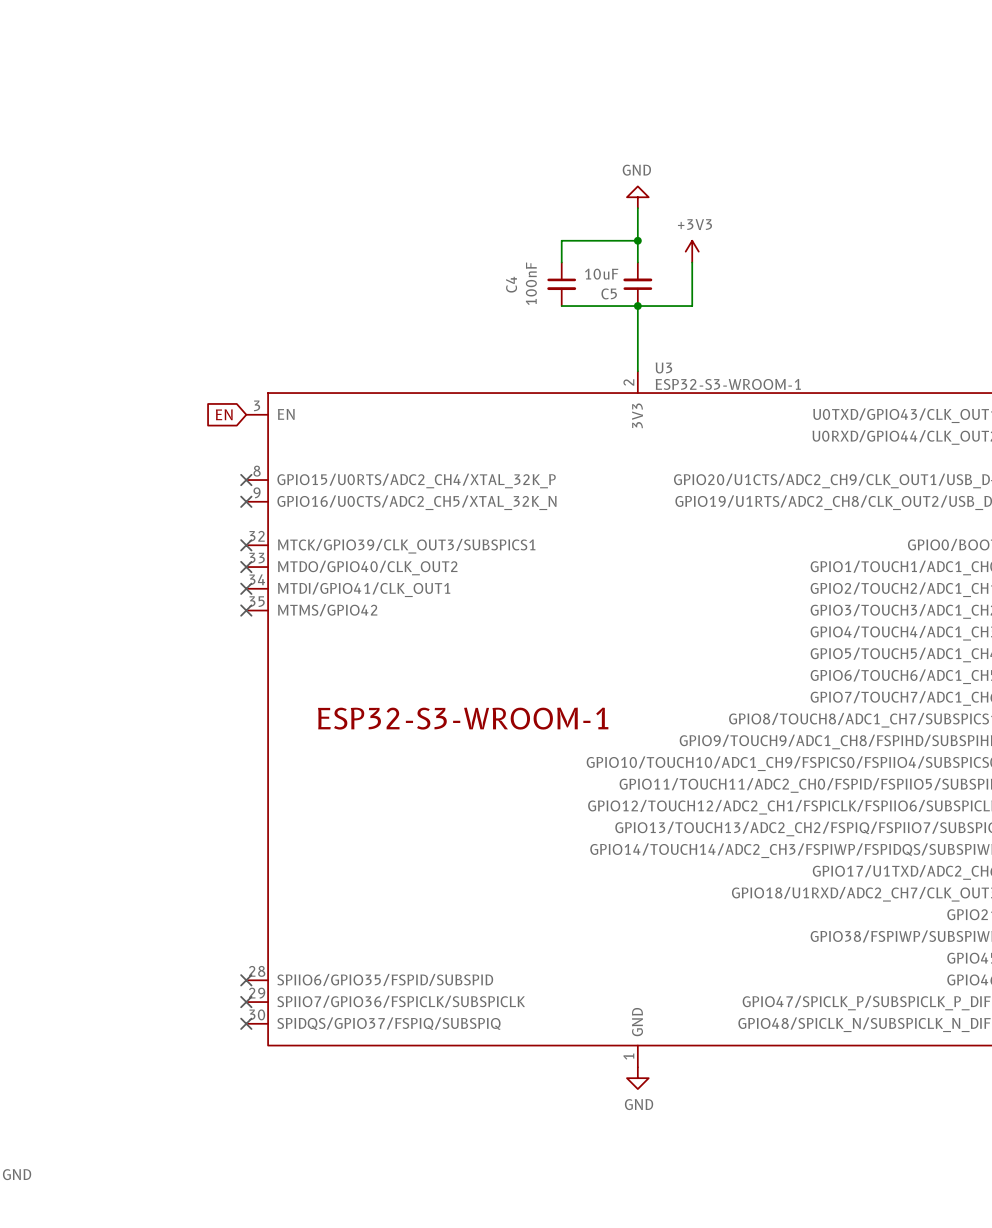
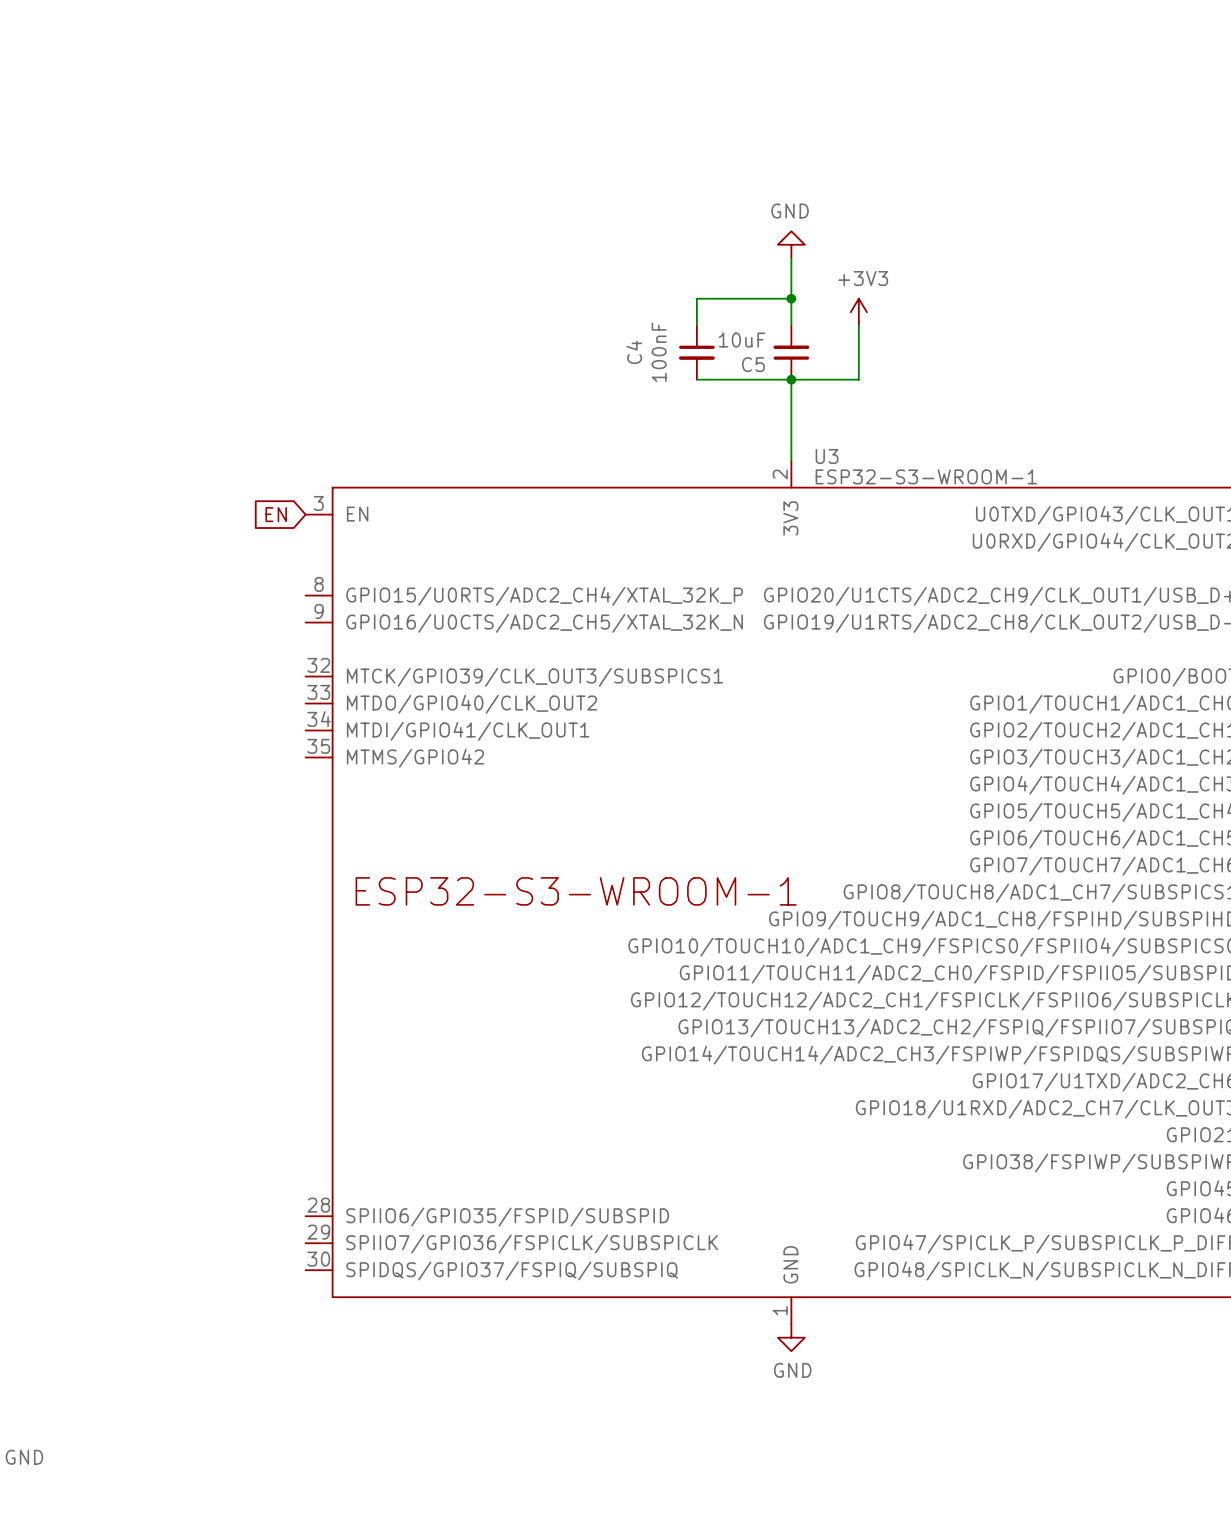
no-connect mark: (246, 480) -> none
no-connect mark: (246, 501) -> none
no-connect mark: (246, 545) -> none
no-connect mark: (246, 567) -> none
no-connect mark: (246, 588) -> none
no-connect mark: (246, 610) -> none
no-connect mark: (246, 980) -> none
no-connect mark: (246, 1002) -> none
no-connect mark: (246, 1023) -> none

